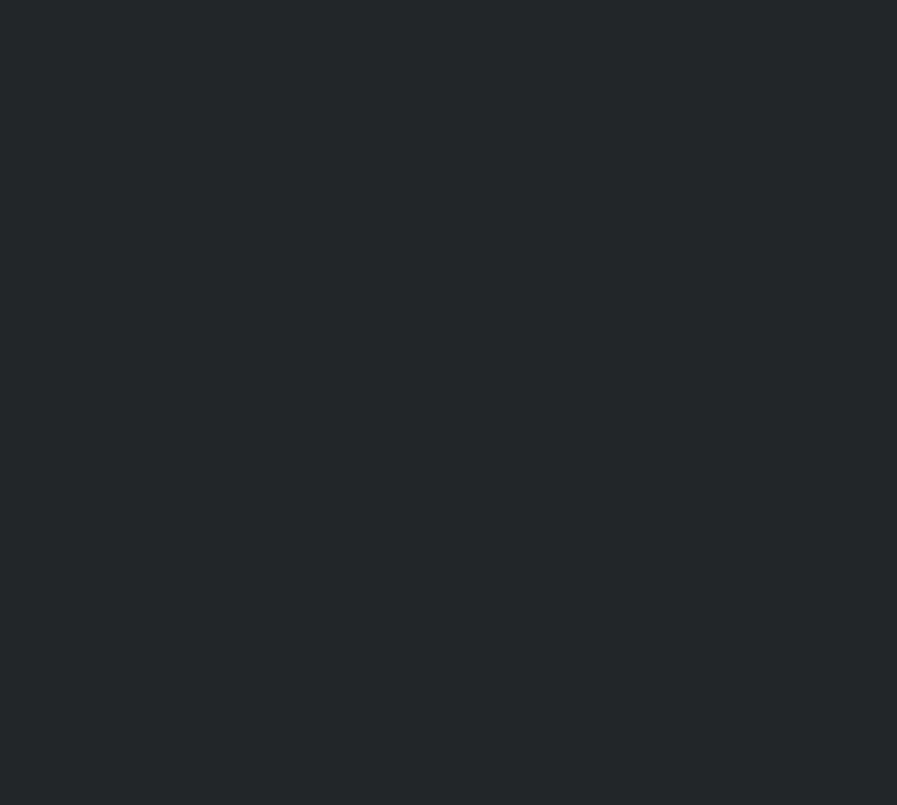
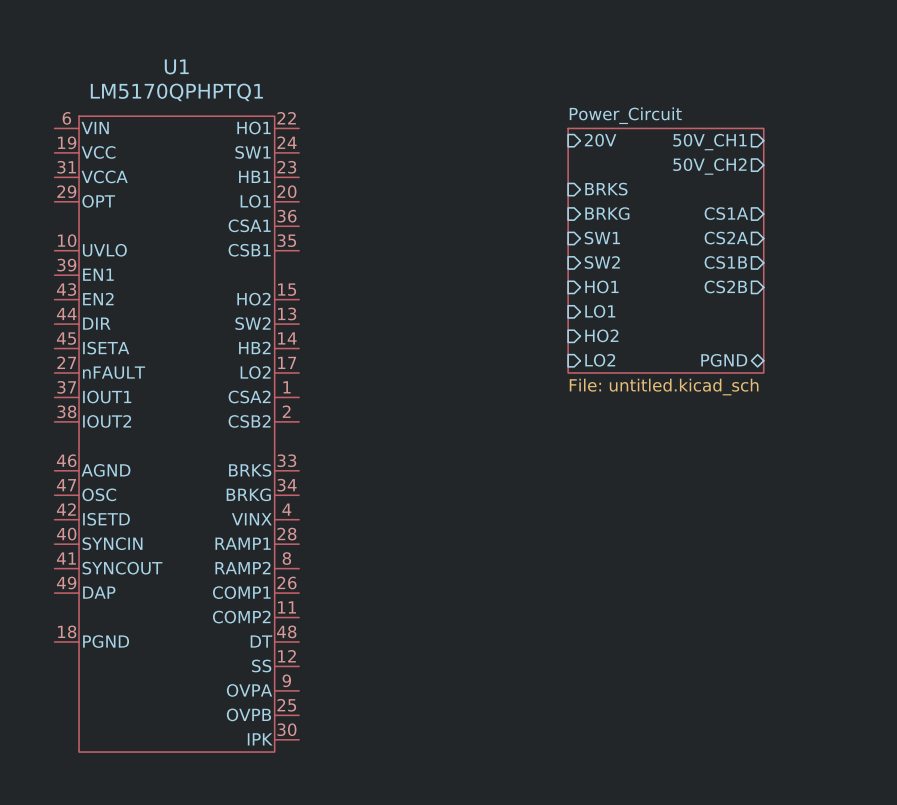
sheet pin: none -> 20V (600, 140)
sheet pin: none -> 50V_CH1 (709, 142)
sheet pin: none -> 50V_CH2 (709, 166)
sheet pin: none -> BRKS (606, 189)
sheet pin: none -> BRKG (607, 213)
sheet pin: none -> CS1A (726, 213)
sheet pin: none -> SW1 (602, 238)
sheet pin: none -> CS2A (726, 238)
sheet Power_Circuit: none -> File: untitled.kicad_sch (665, 250)
sheet pin: none -> SW2 (602, 262)
sheet pin: none -> CS1B (725, 262)
sheet pin: none -> HO1 (601, 286)
sheet pin: none -> CS2B (725, 286)
sheet pin: none -> LO1 (600, 311)
sheet pin: none -> HO2 (601, 335)
sheet pin: none -> LO2 (600, 360)
sheet pin: none -> PGND (724, 360)
U1: none -> LM5170QPHPTQ1 (176, 434)

